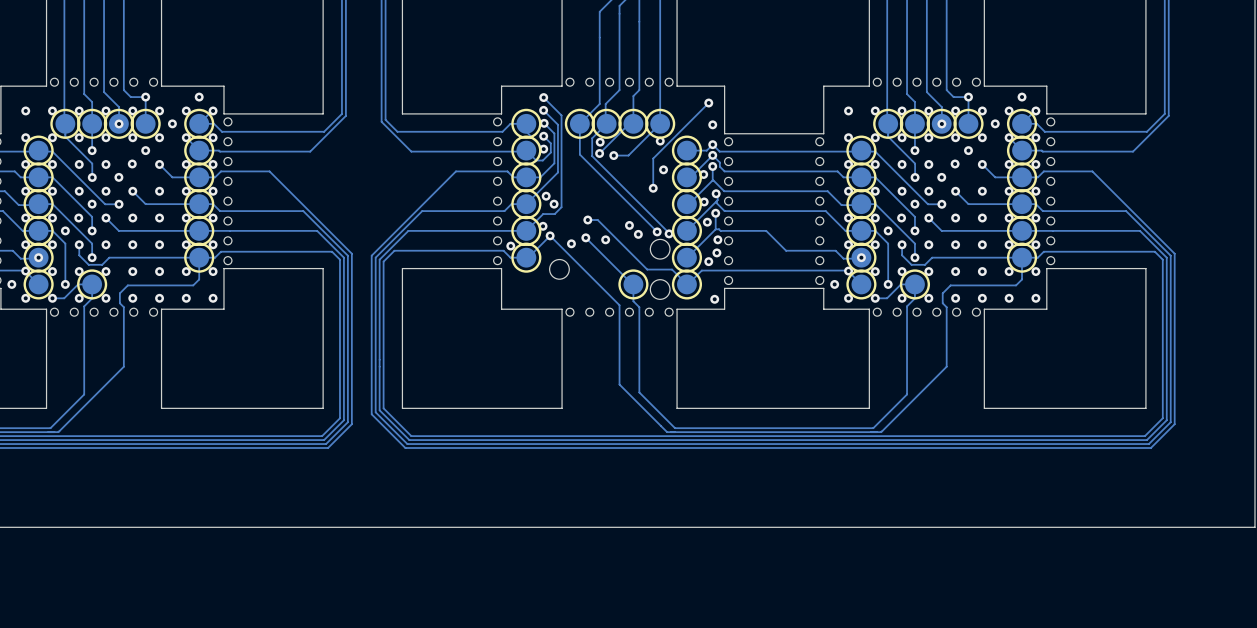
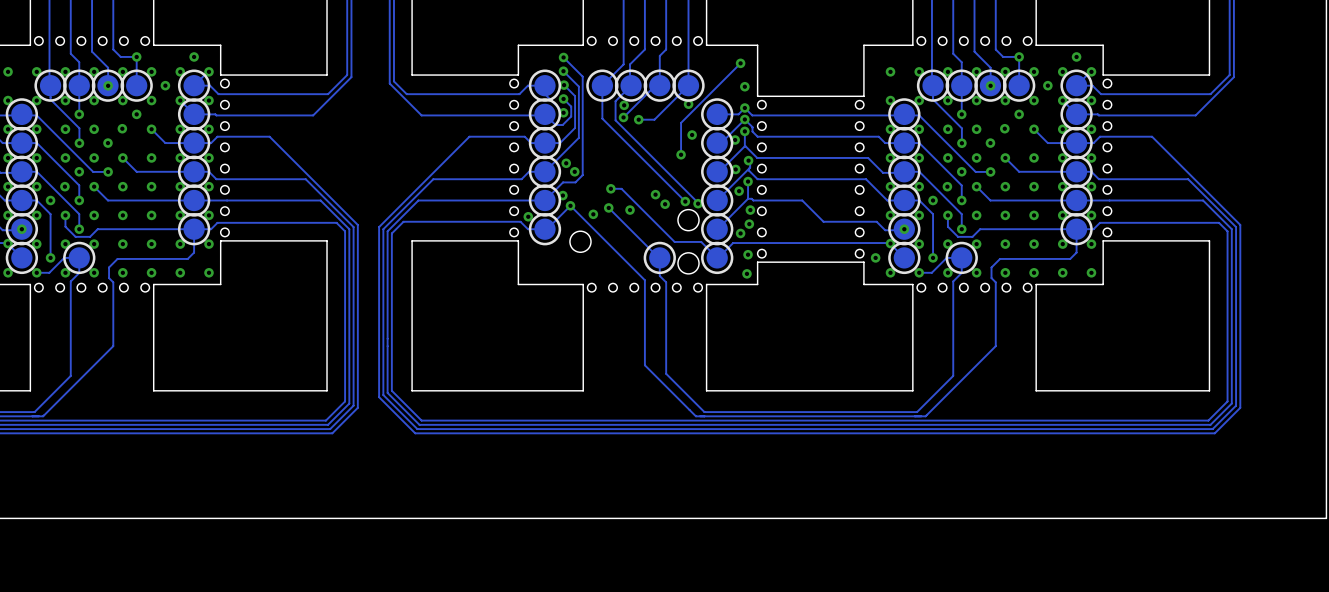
via: none -> (748, 254)

